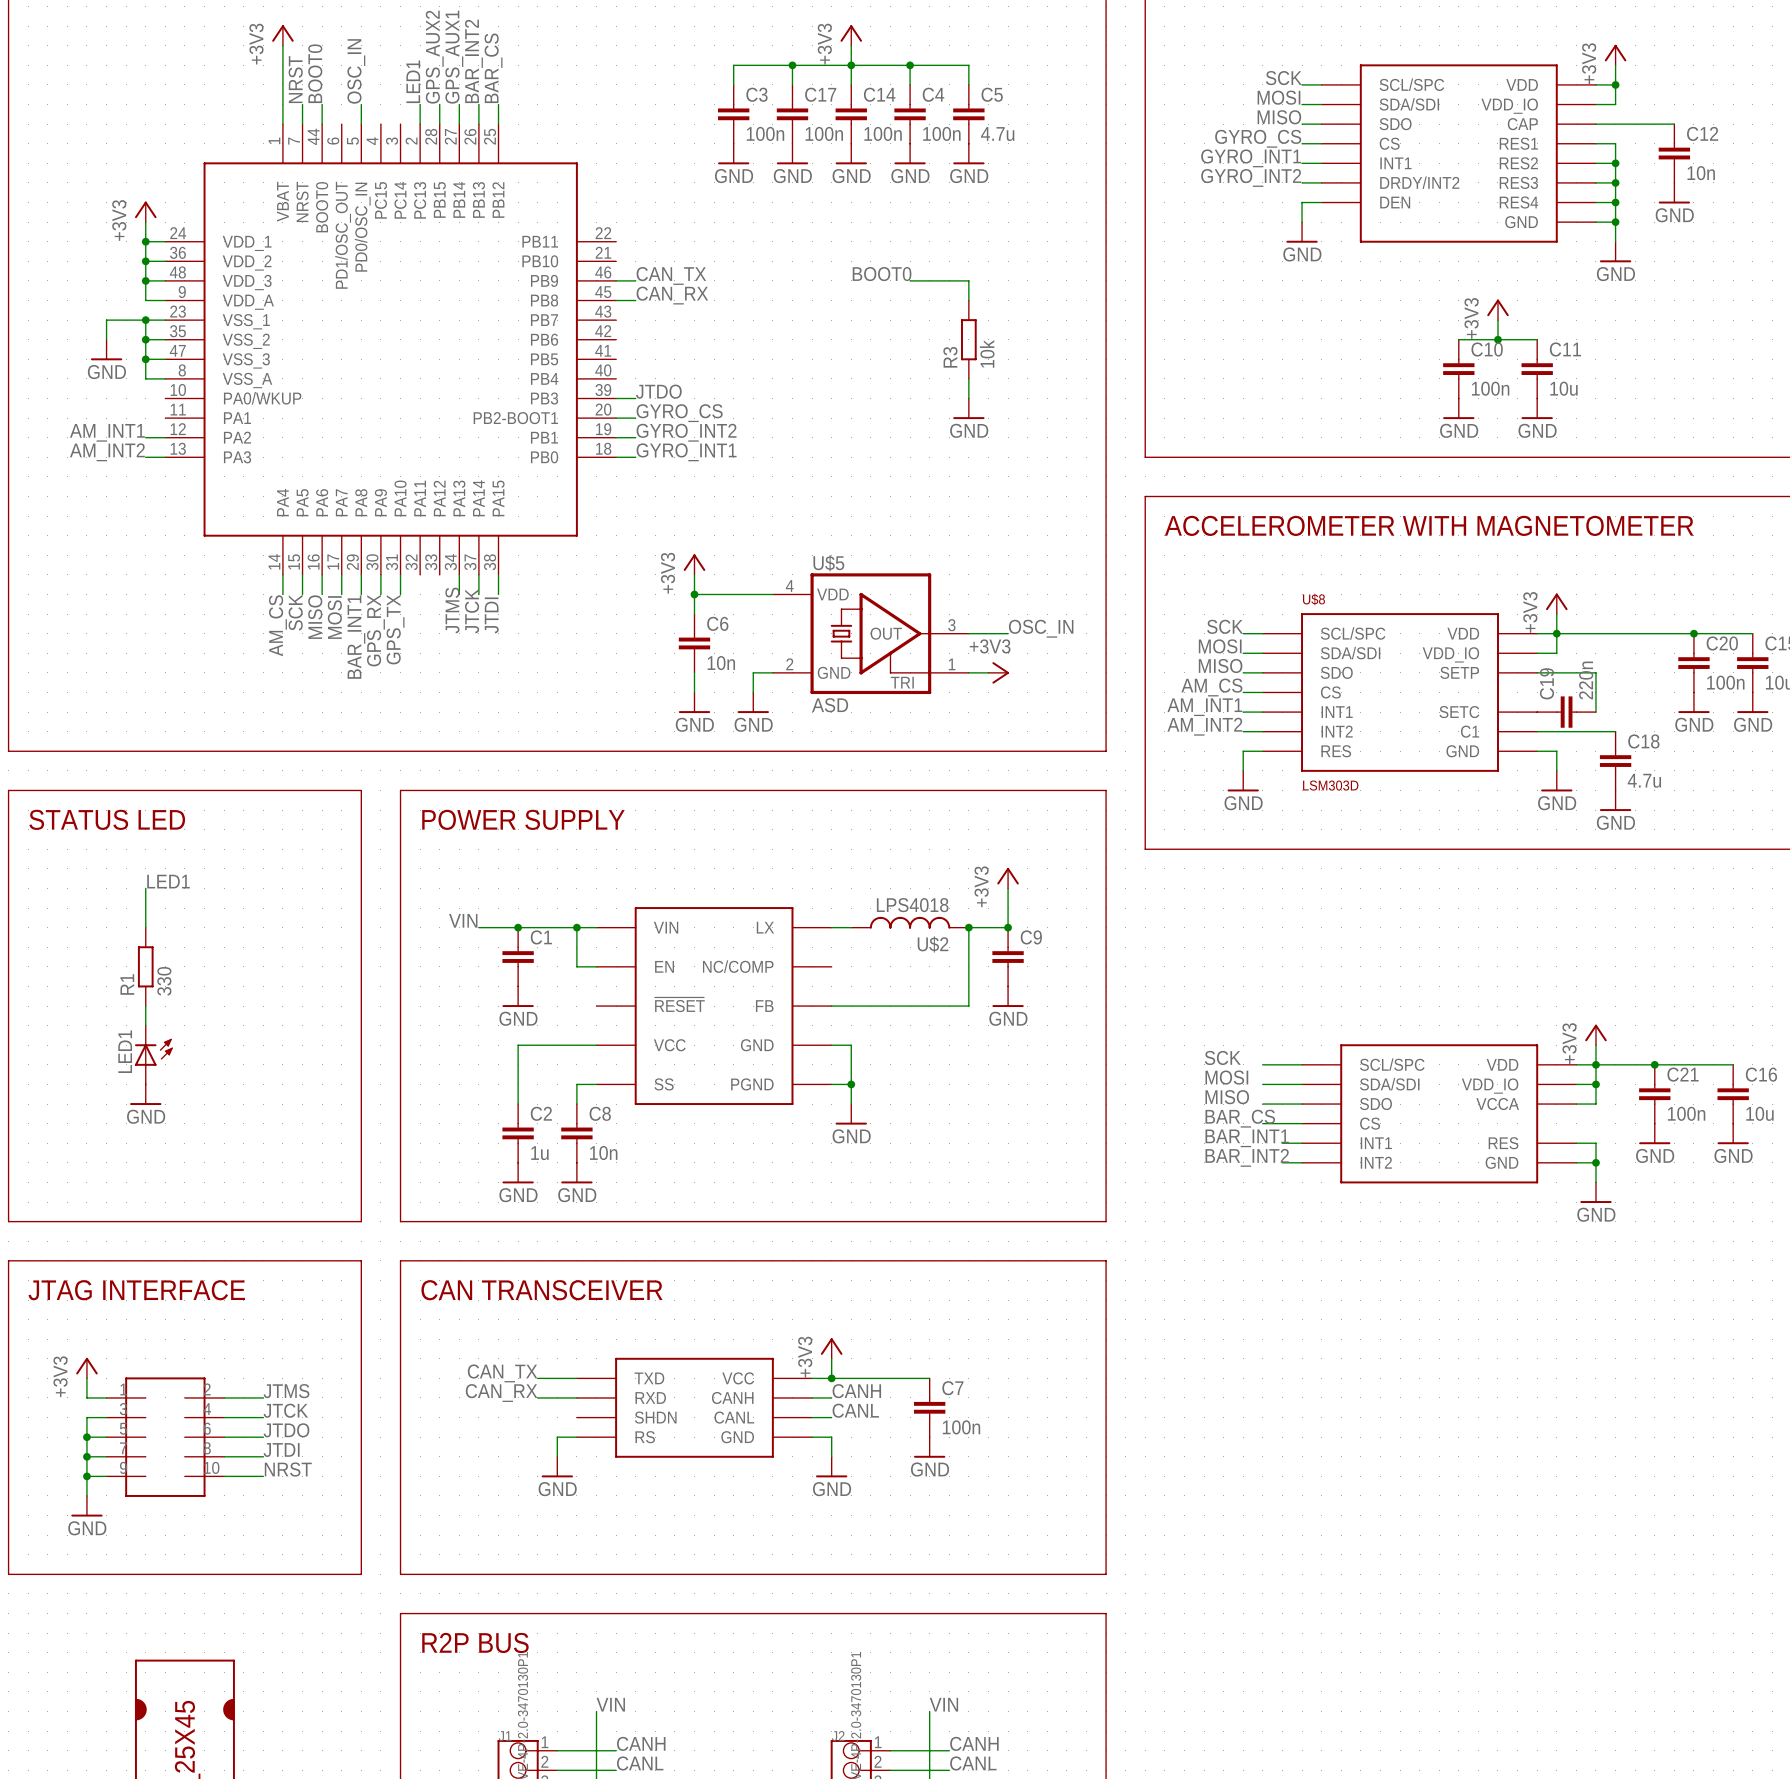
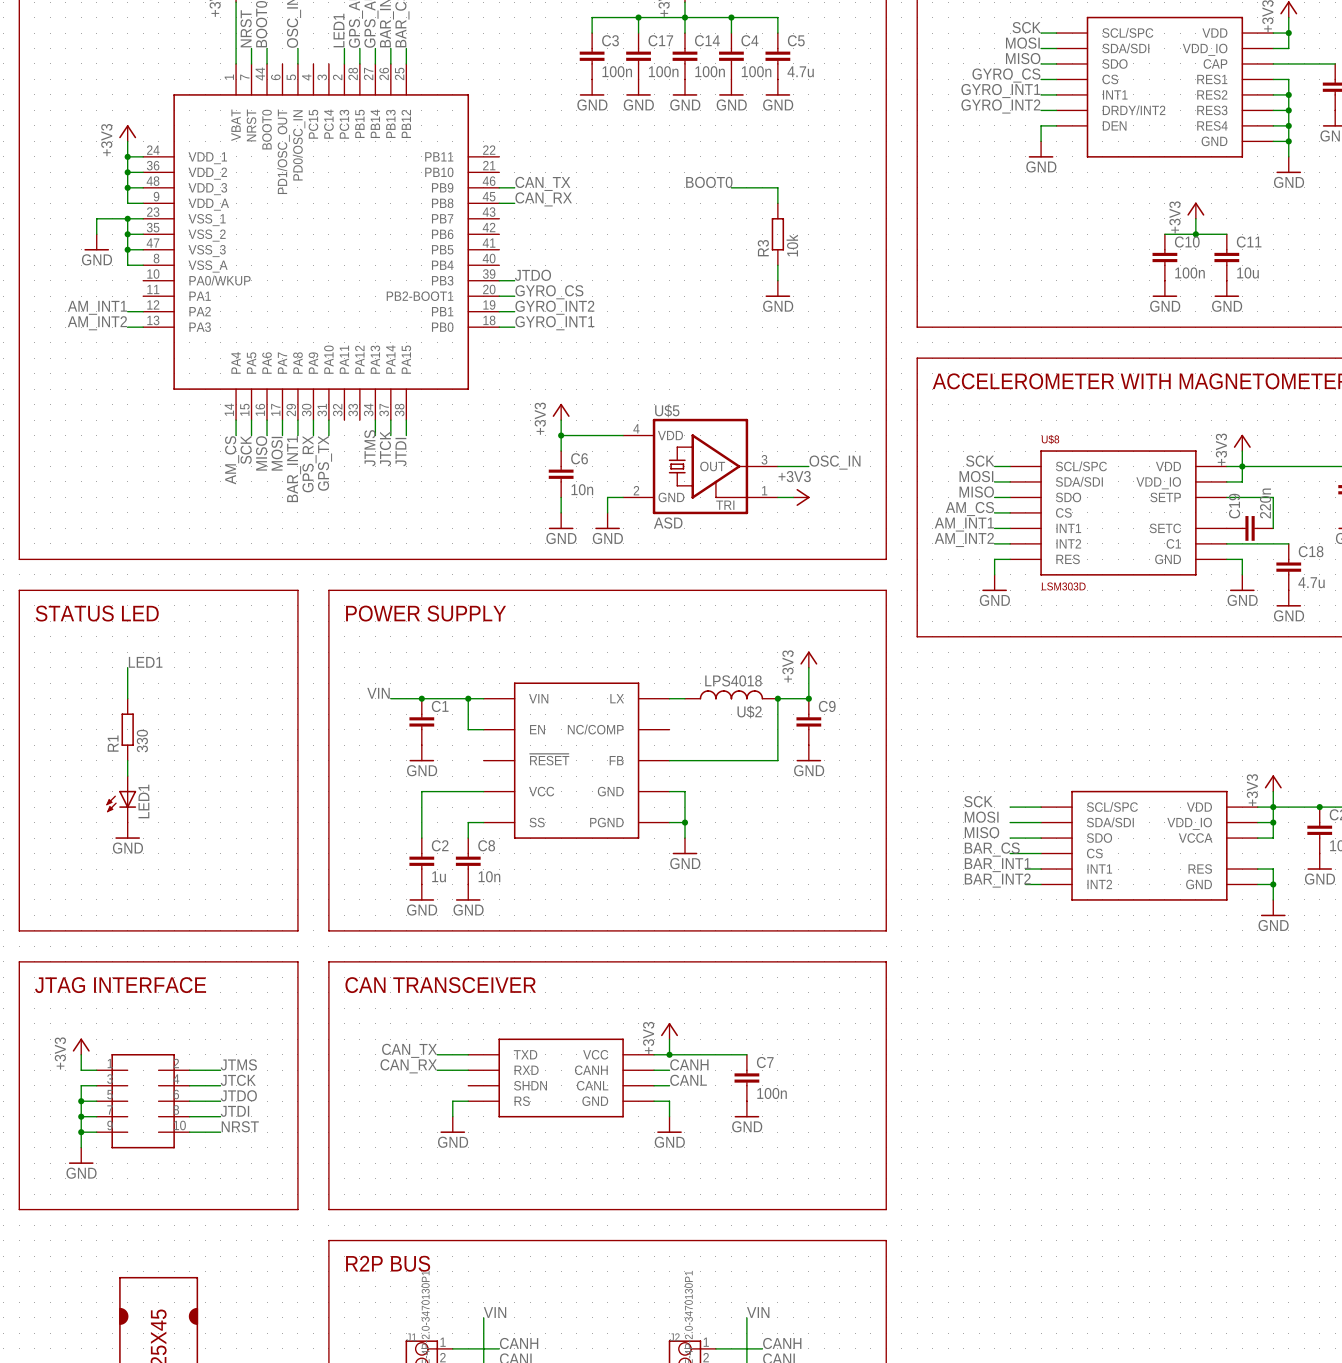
LED1 rotation: 0° (153, 1052) -> 180° (121, 801)

